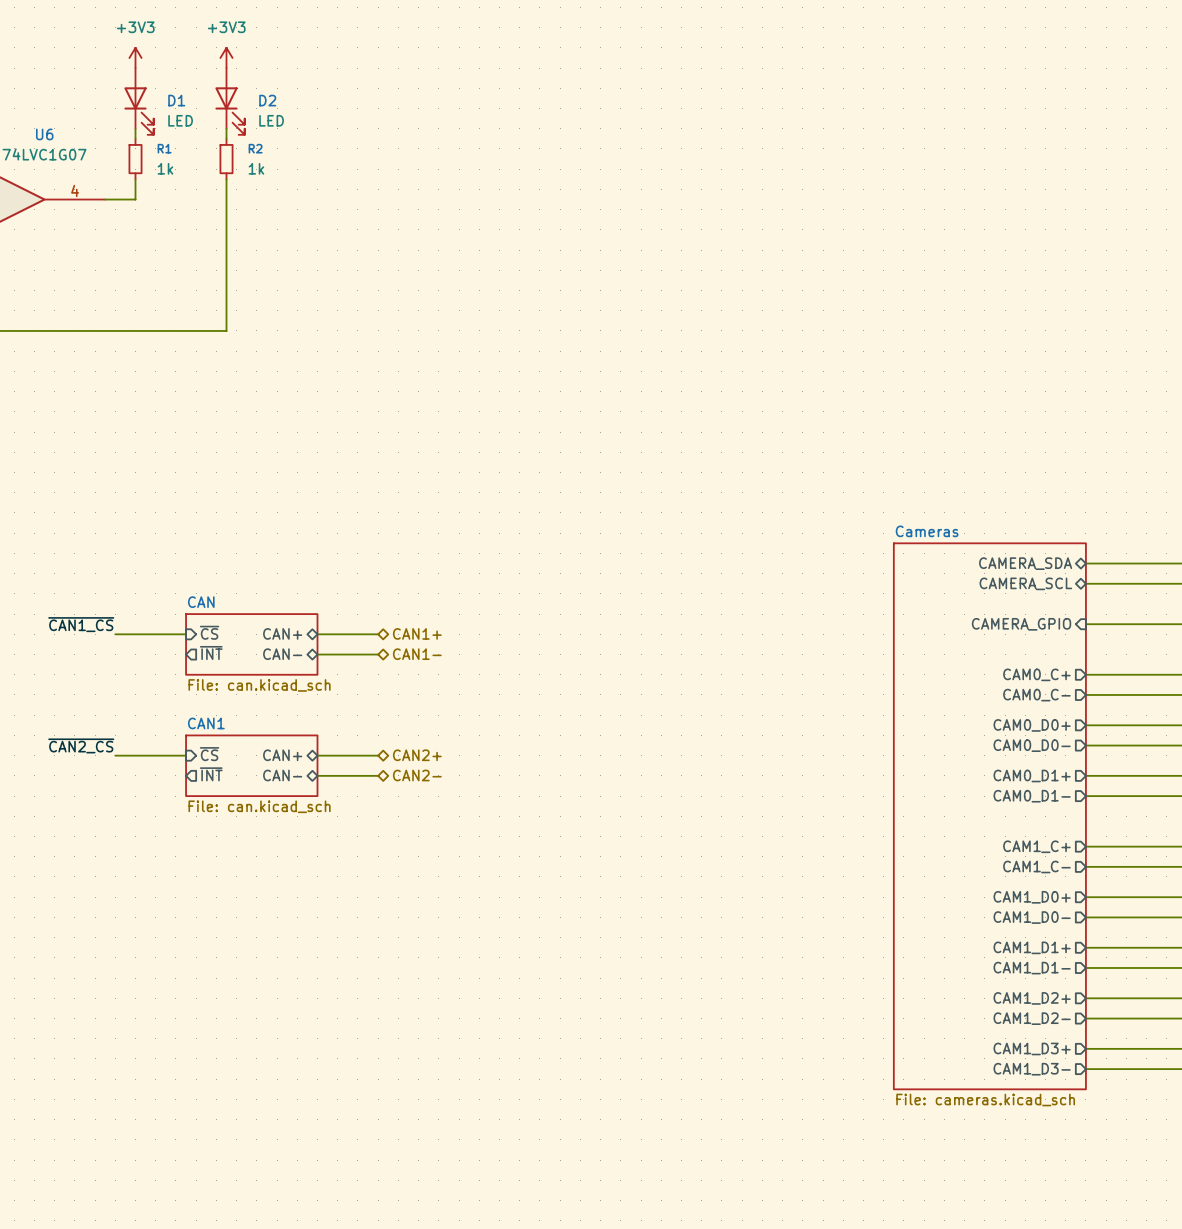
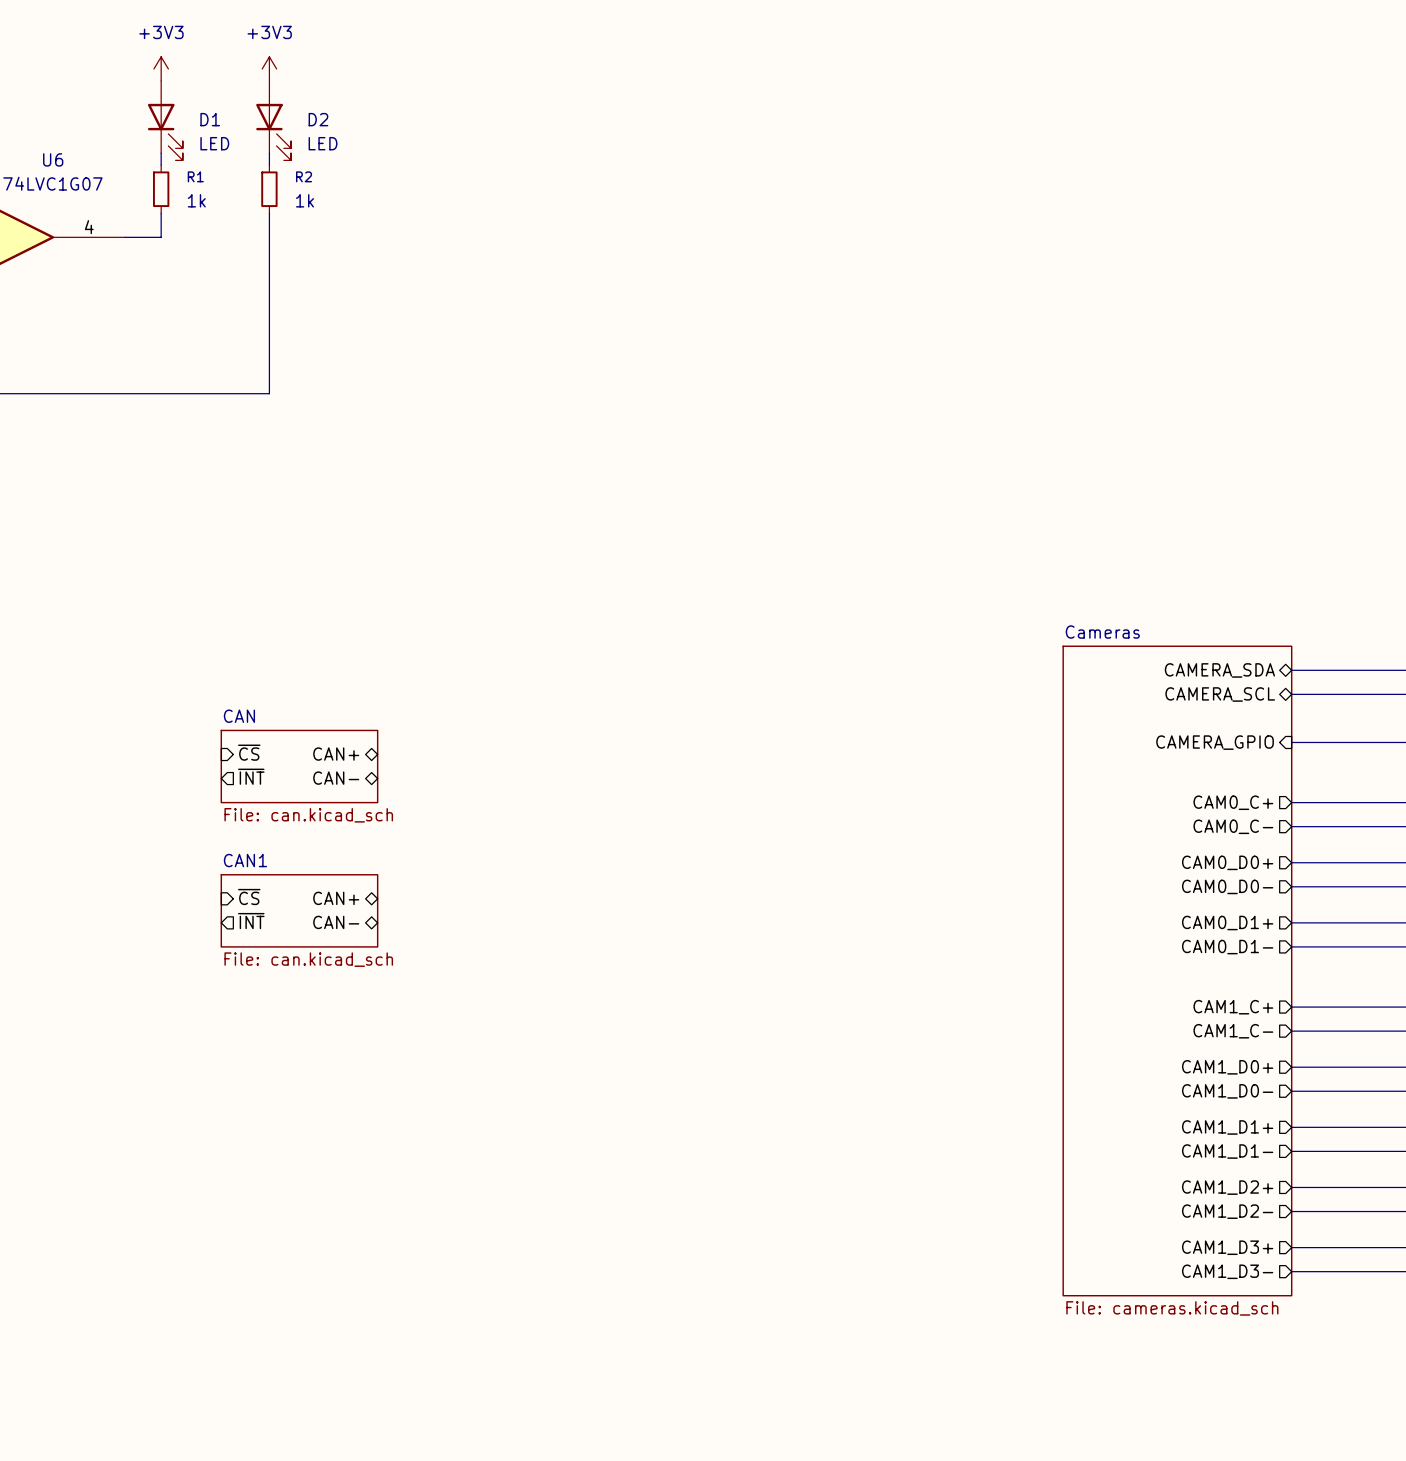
label: ~{CAN1_CS} (81, 624) -> none
hierarchical label: CAN1+ (417, 633) -> none
wire: (115, 634) (186, 634) -> none
wire: (317, 634) (378, 634) -> none
wire: (317, 654) (378, 654) -> none
hierarchical label: CAN1- (417, 654) -> none
label: ~{CAN2_CS} (81, 745) -> none
wire: (115, 755) (186, 755) -> none
wire: (317, 755) (378, 755) -> none
hierarchical label: CAN2+ (417, 755) -> none
wire: (317, 775) (378, 775) -> none
hierarchical label: CAN2- (417, 775) -> none

